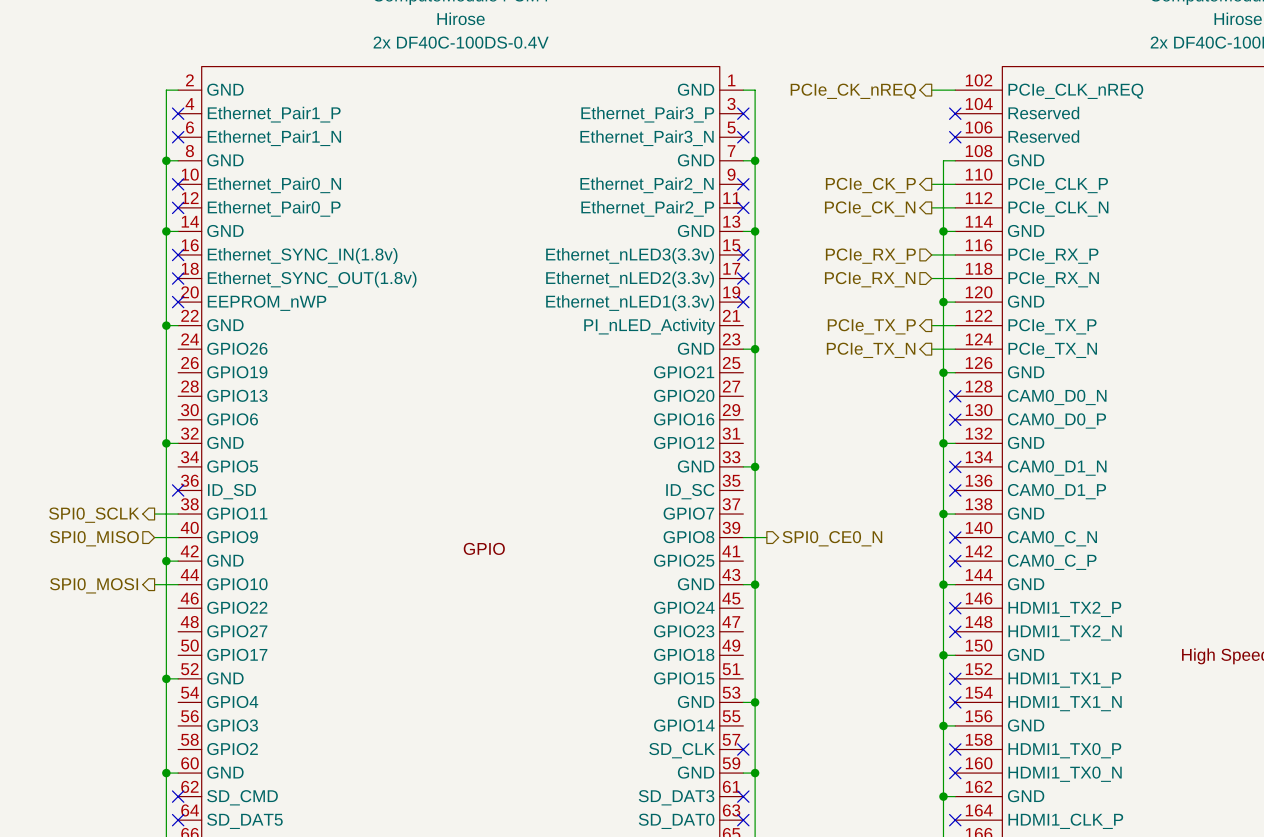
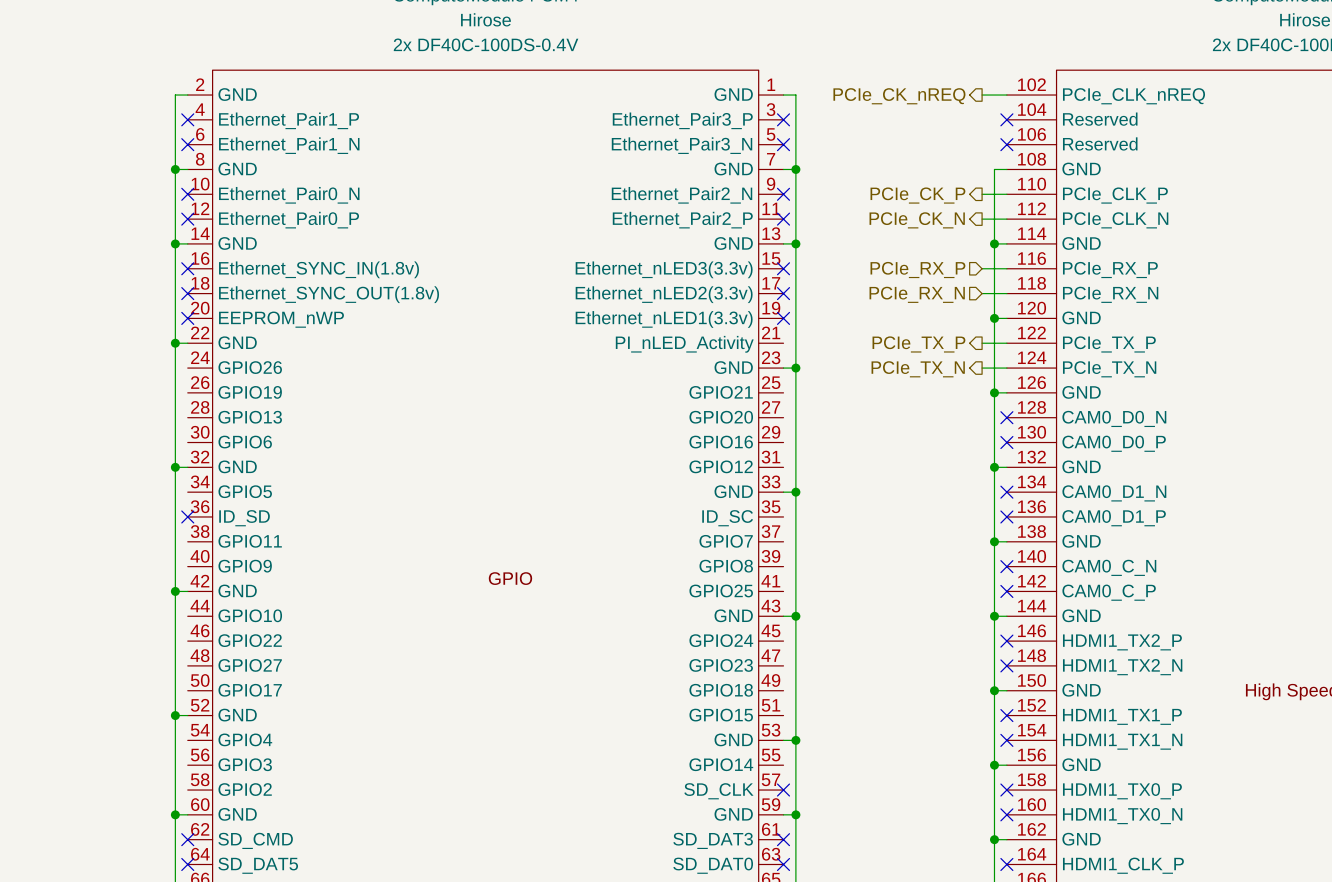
wire: (154, 514) (178, 514) -> none
hierarchical label: SPI0_SCLK (94, 515) -> none
wire: (154, 537) (178, 537) -> none
wire: (743, 537) (766, 537) -> none
hierarchical label: SPI0_MISO (94, 538) -> none
hierarchical label: SPI0_CE0_N (832, 538) -> none
wire: (154, 584) (178, 584) -> none
hierarchical label: SPI0_MOSI (94, 585) -> none

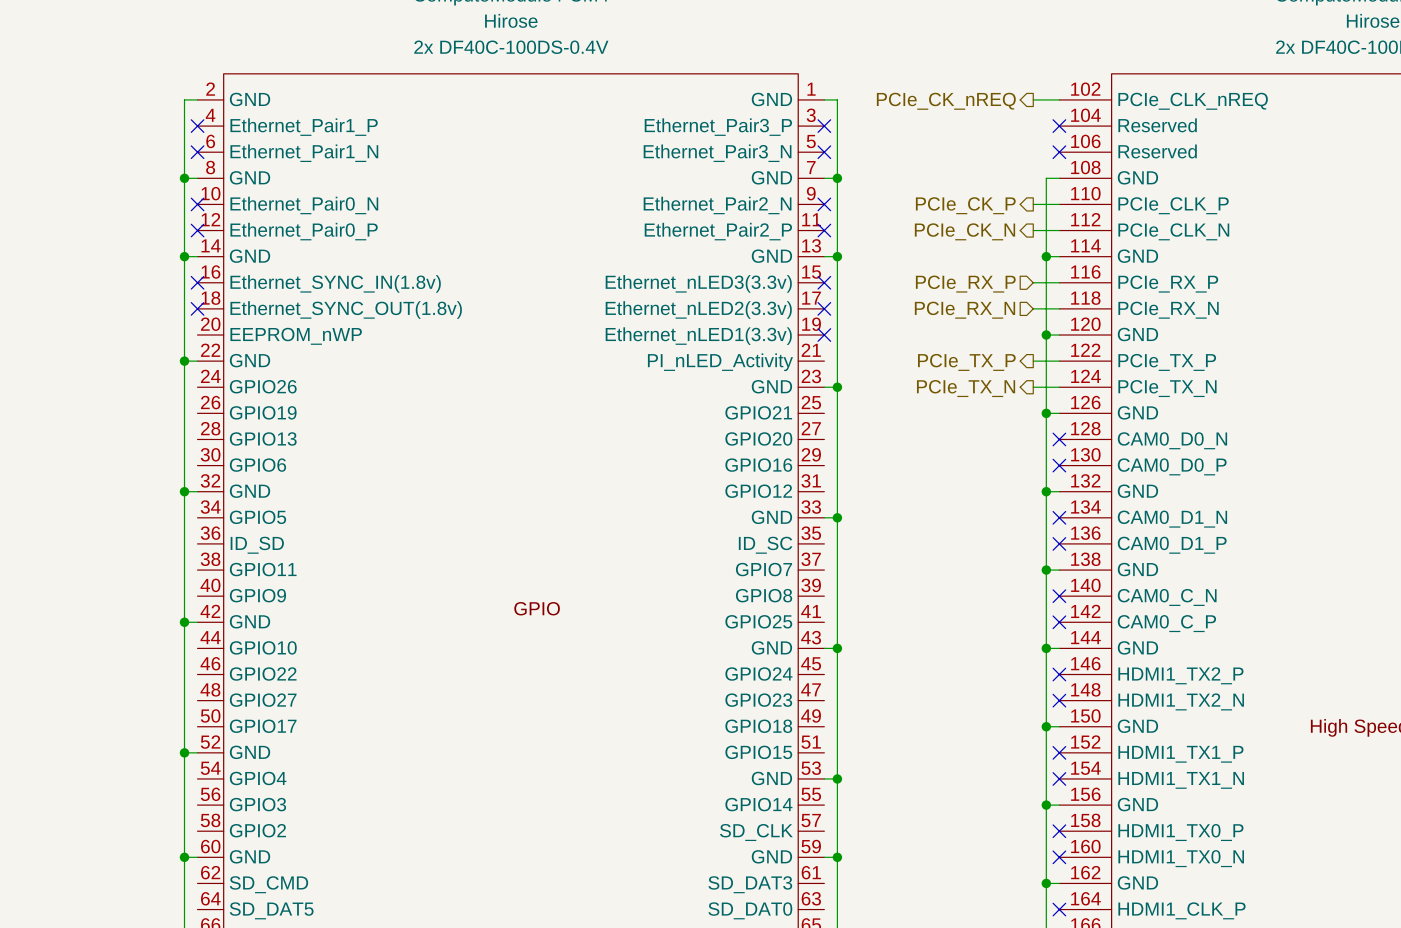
no-connect mark: (187, 318) -> none
no-connect mark: (187, 516) -> none
no-connect mark: (783, 790) -> none
no-connect mark: (187, 839) -> none
no-connect mark: (783, 839) -> none
no-connect mark: (187, 864) -> none
no-connect mark: (783, 864) -> none

